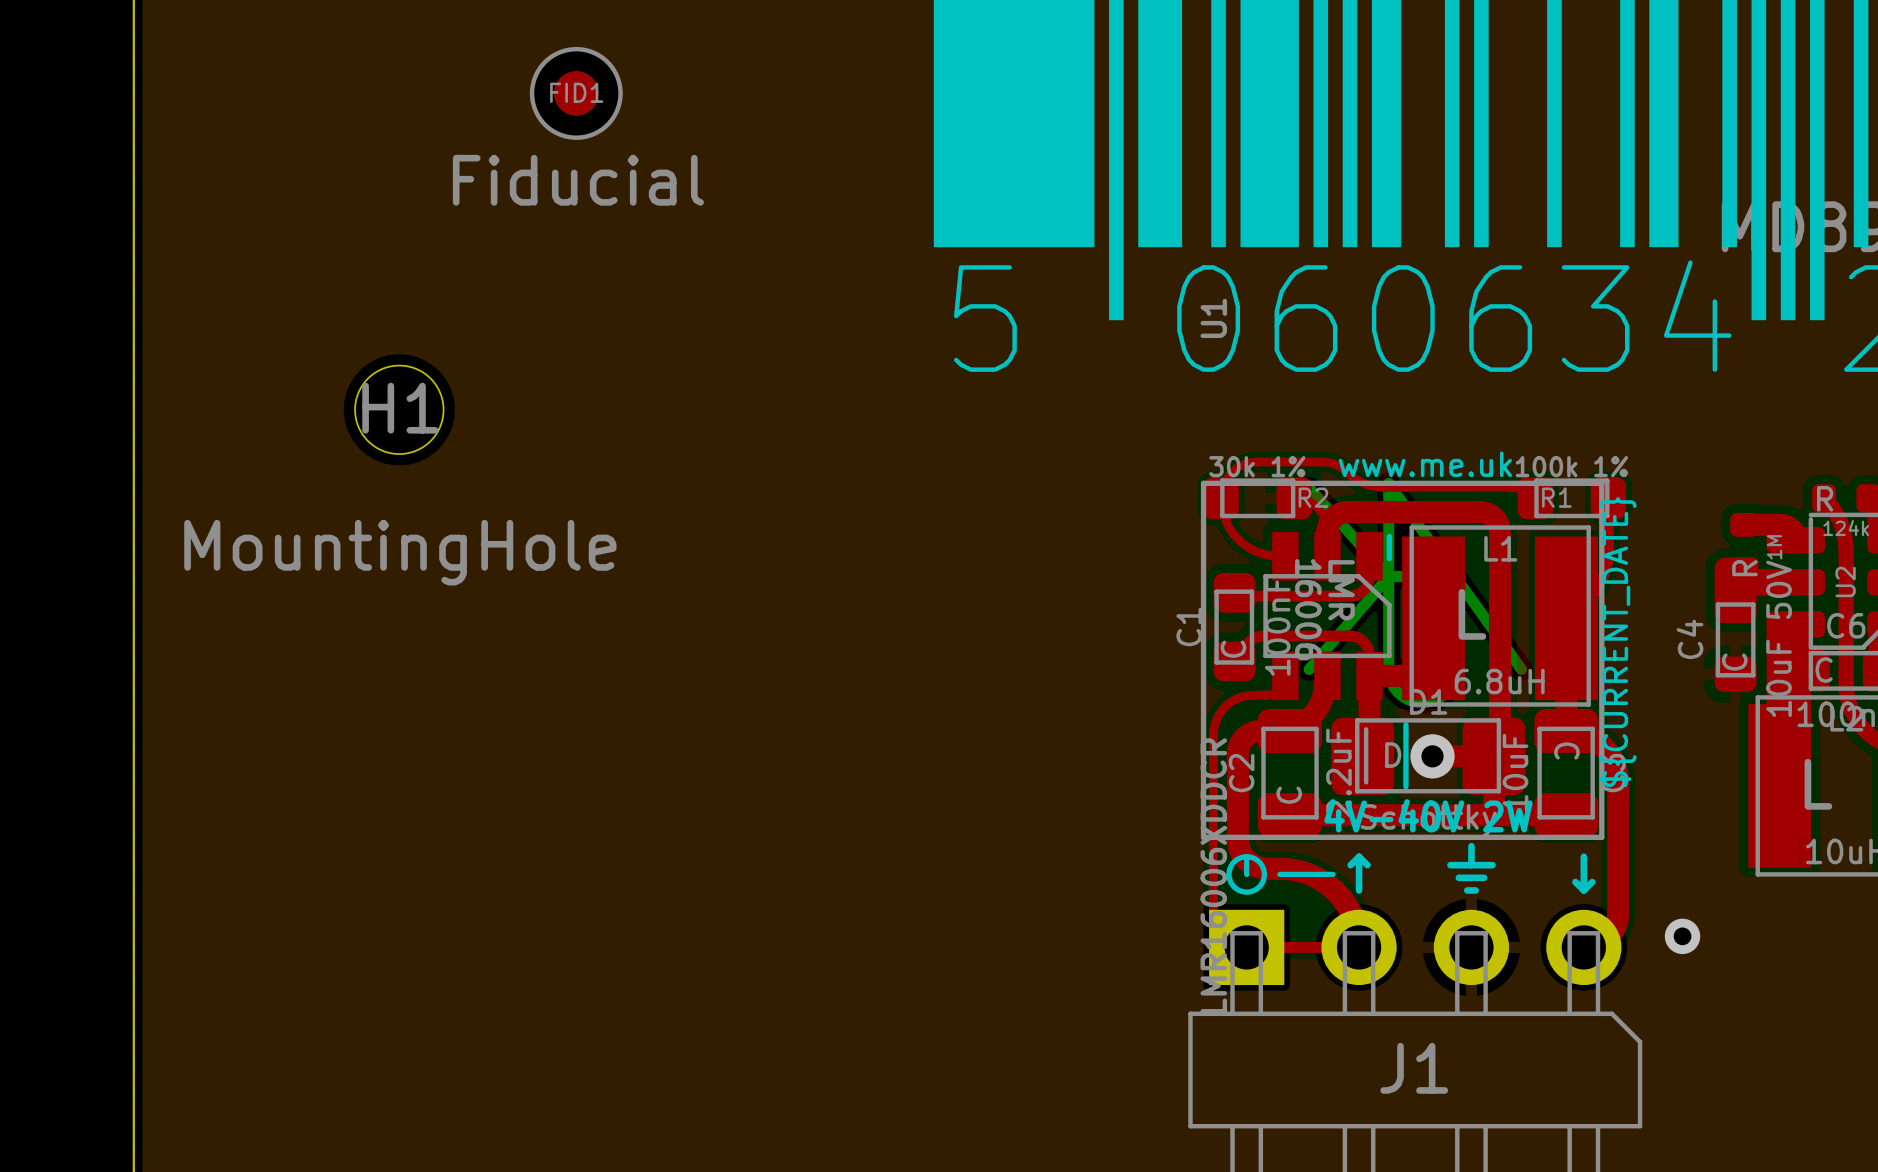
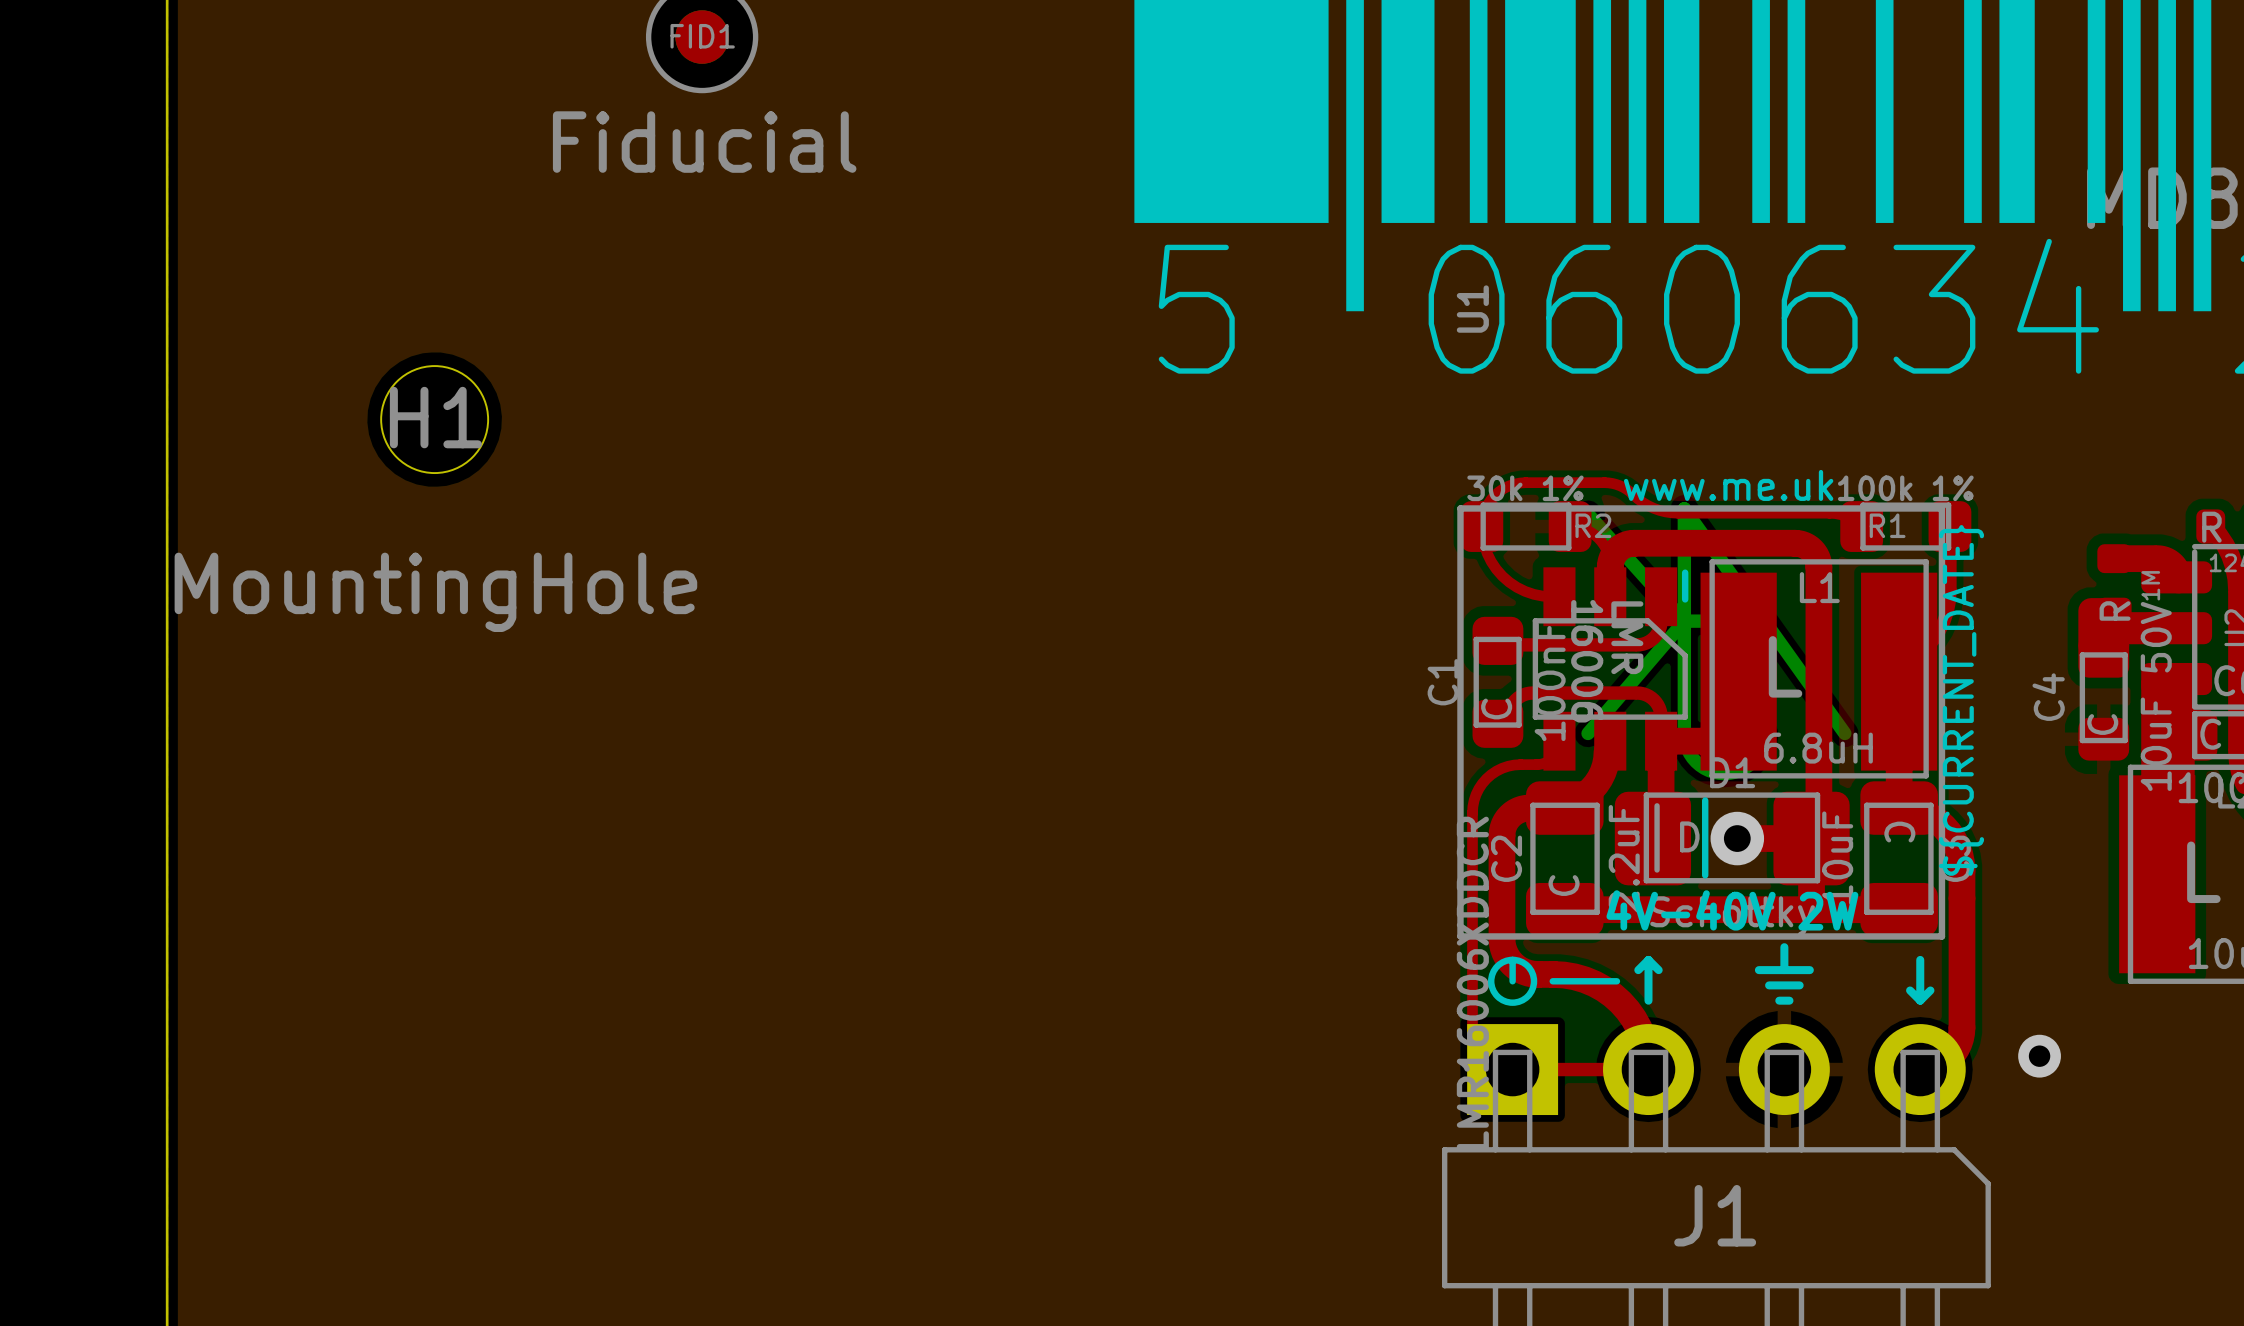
H1 position: (399, 409) -> (434, 419)

